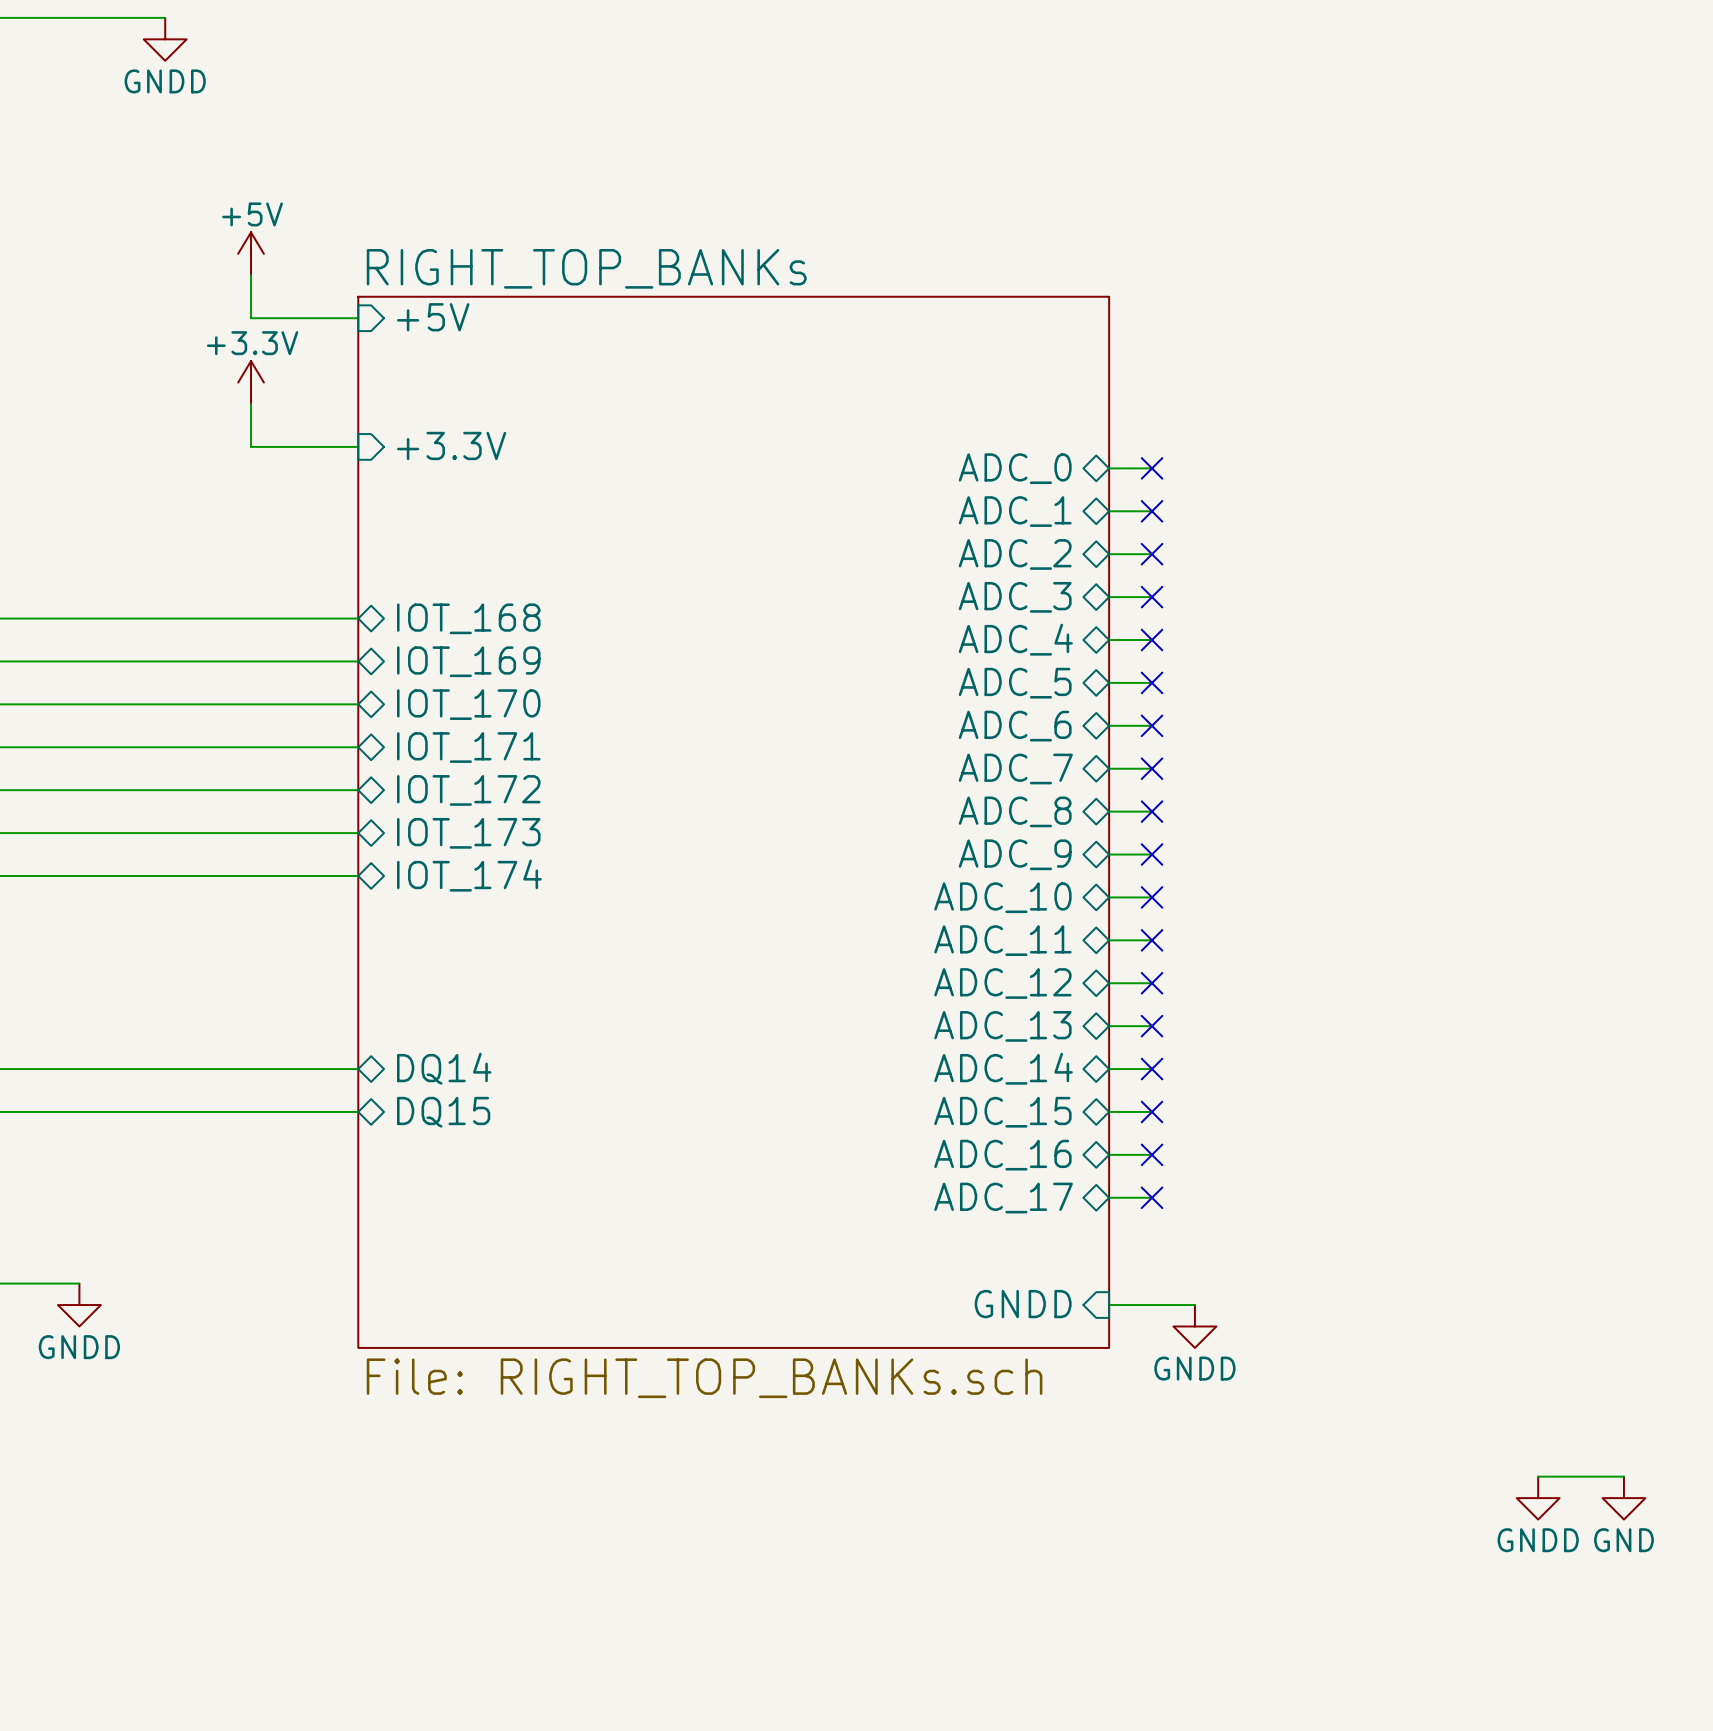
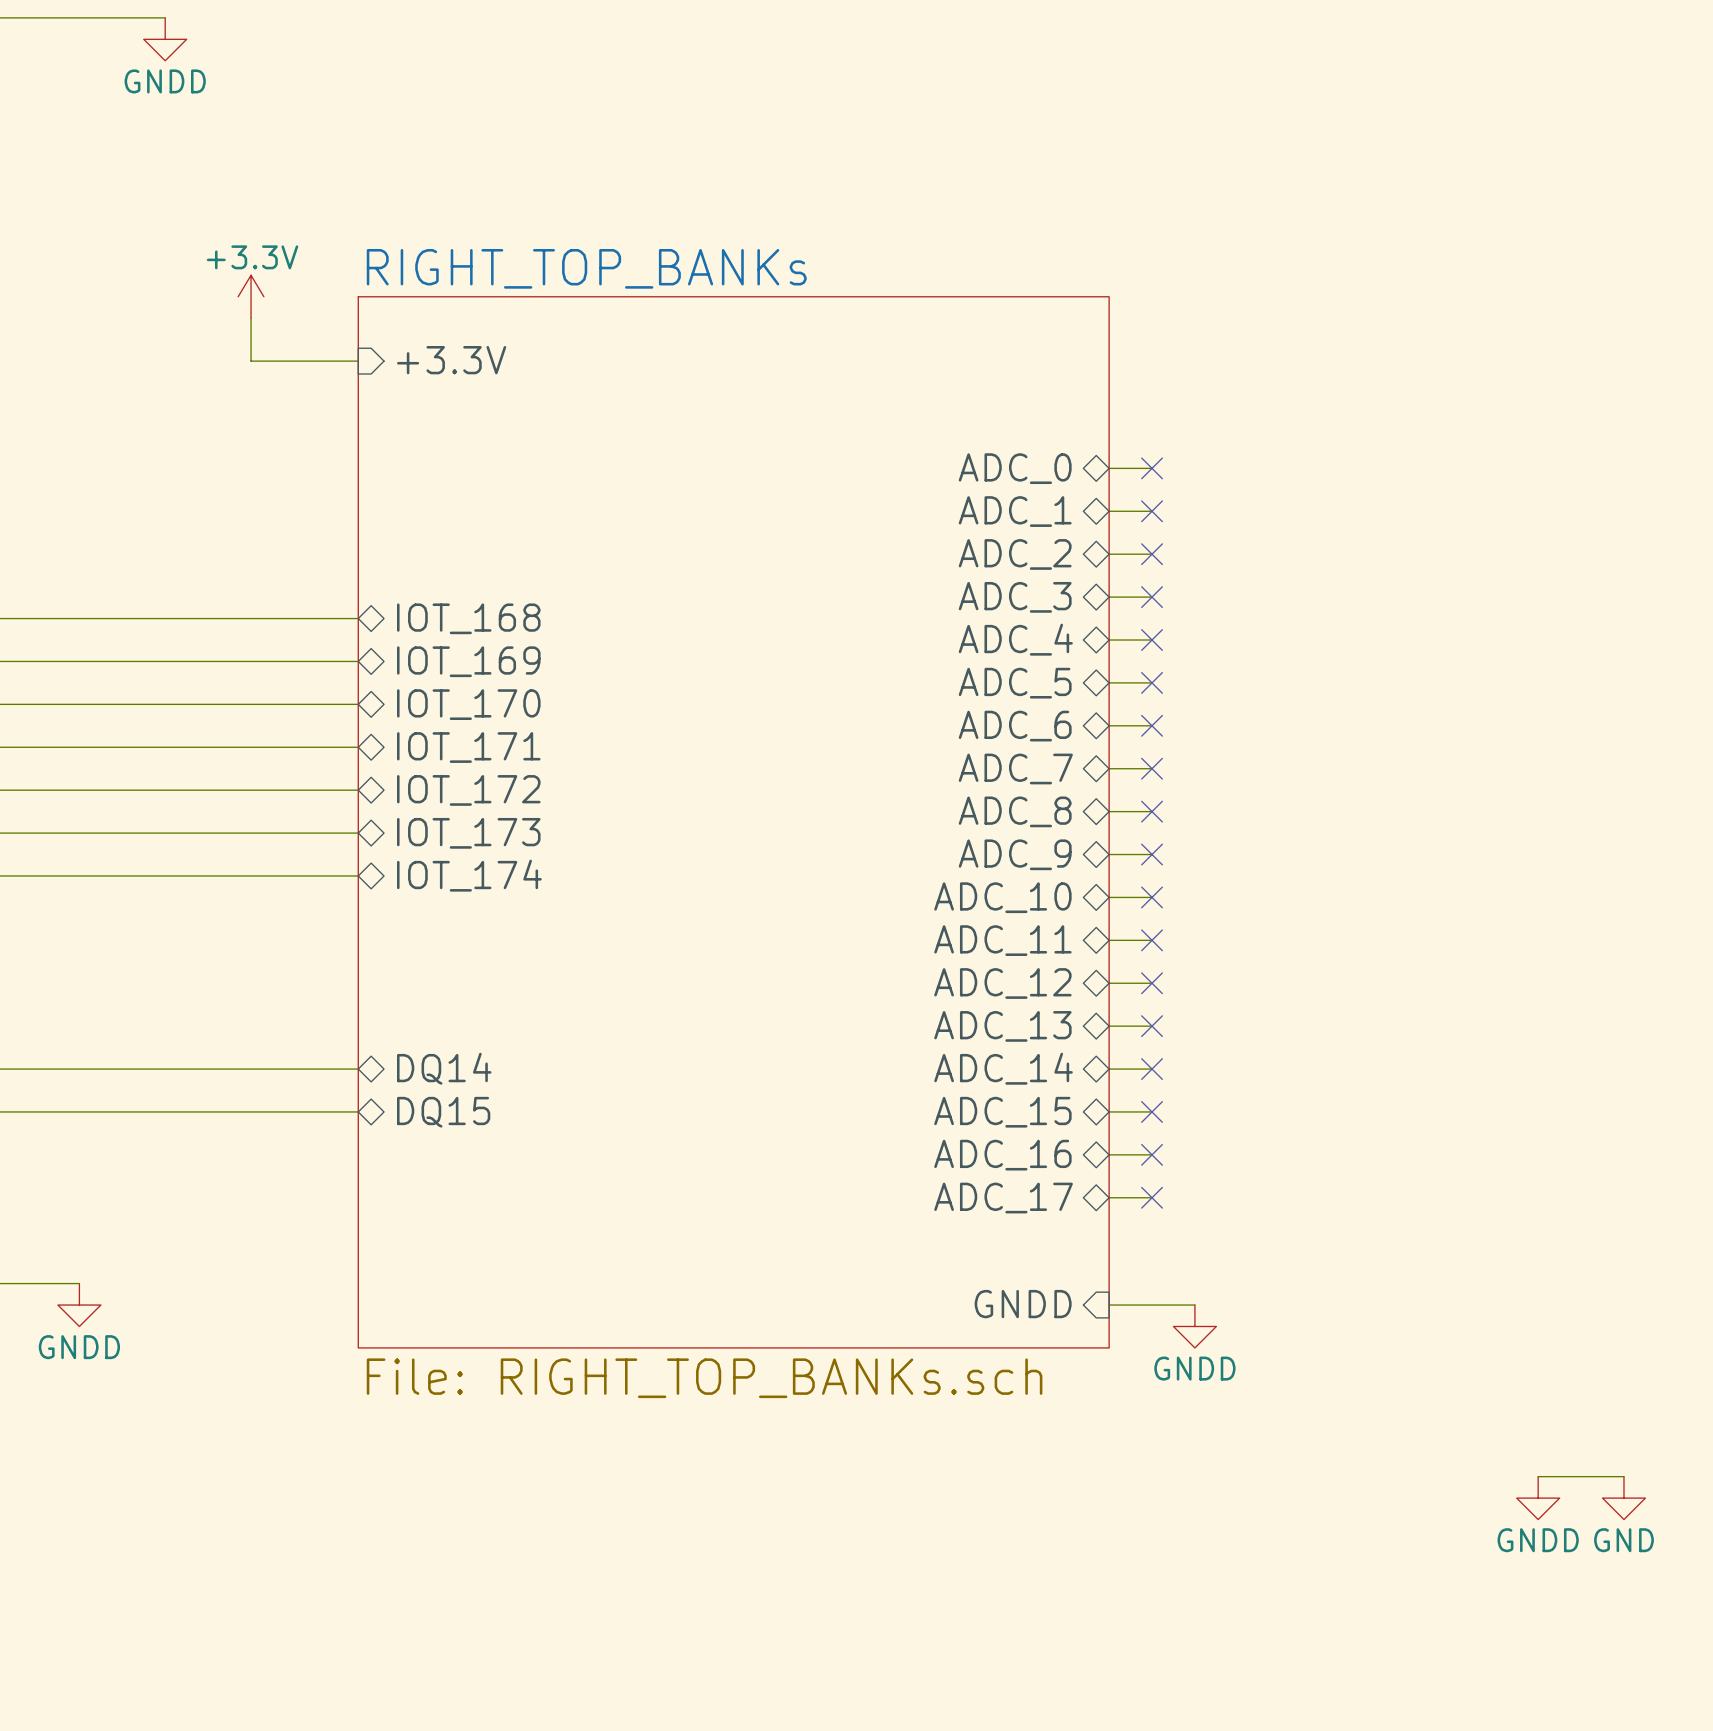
power symbol: +5V (251, 253) -> none
wire: (251, 275) (251, 318) (358, 318) -> (251, 318) (251, 361) (358, 361)
sheet pin: +5V (433, 317) -> none
power symbol position: +3.3V (251, 382) -> +3.3V (251, 296)
wire: (251, 404) (251, 446) (358, 446) -> none
sheet pin position: +3.3V (451, 445) -> +3.3V (451, 360)

